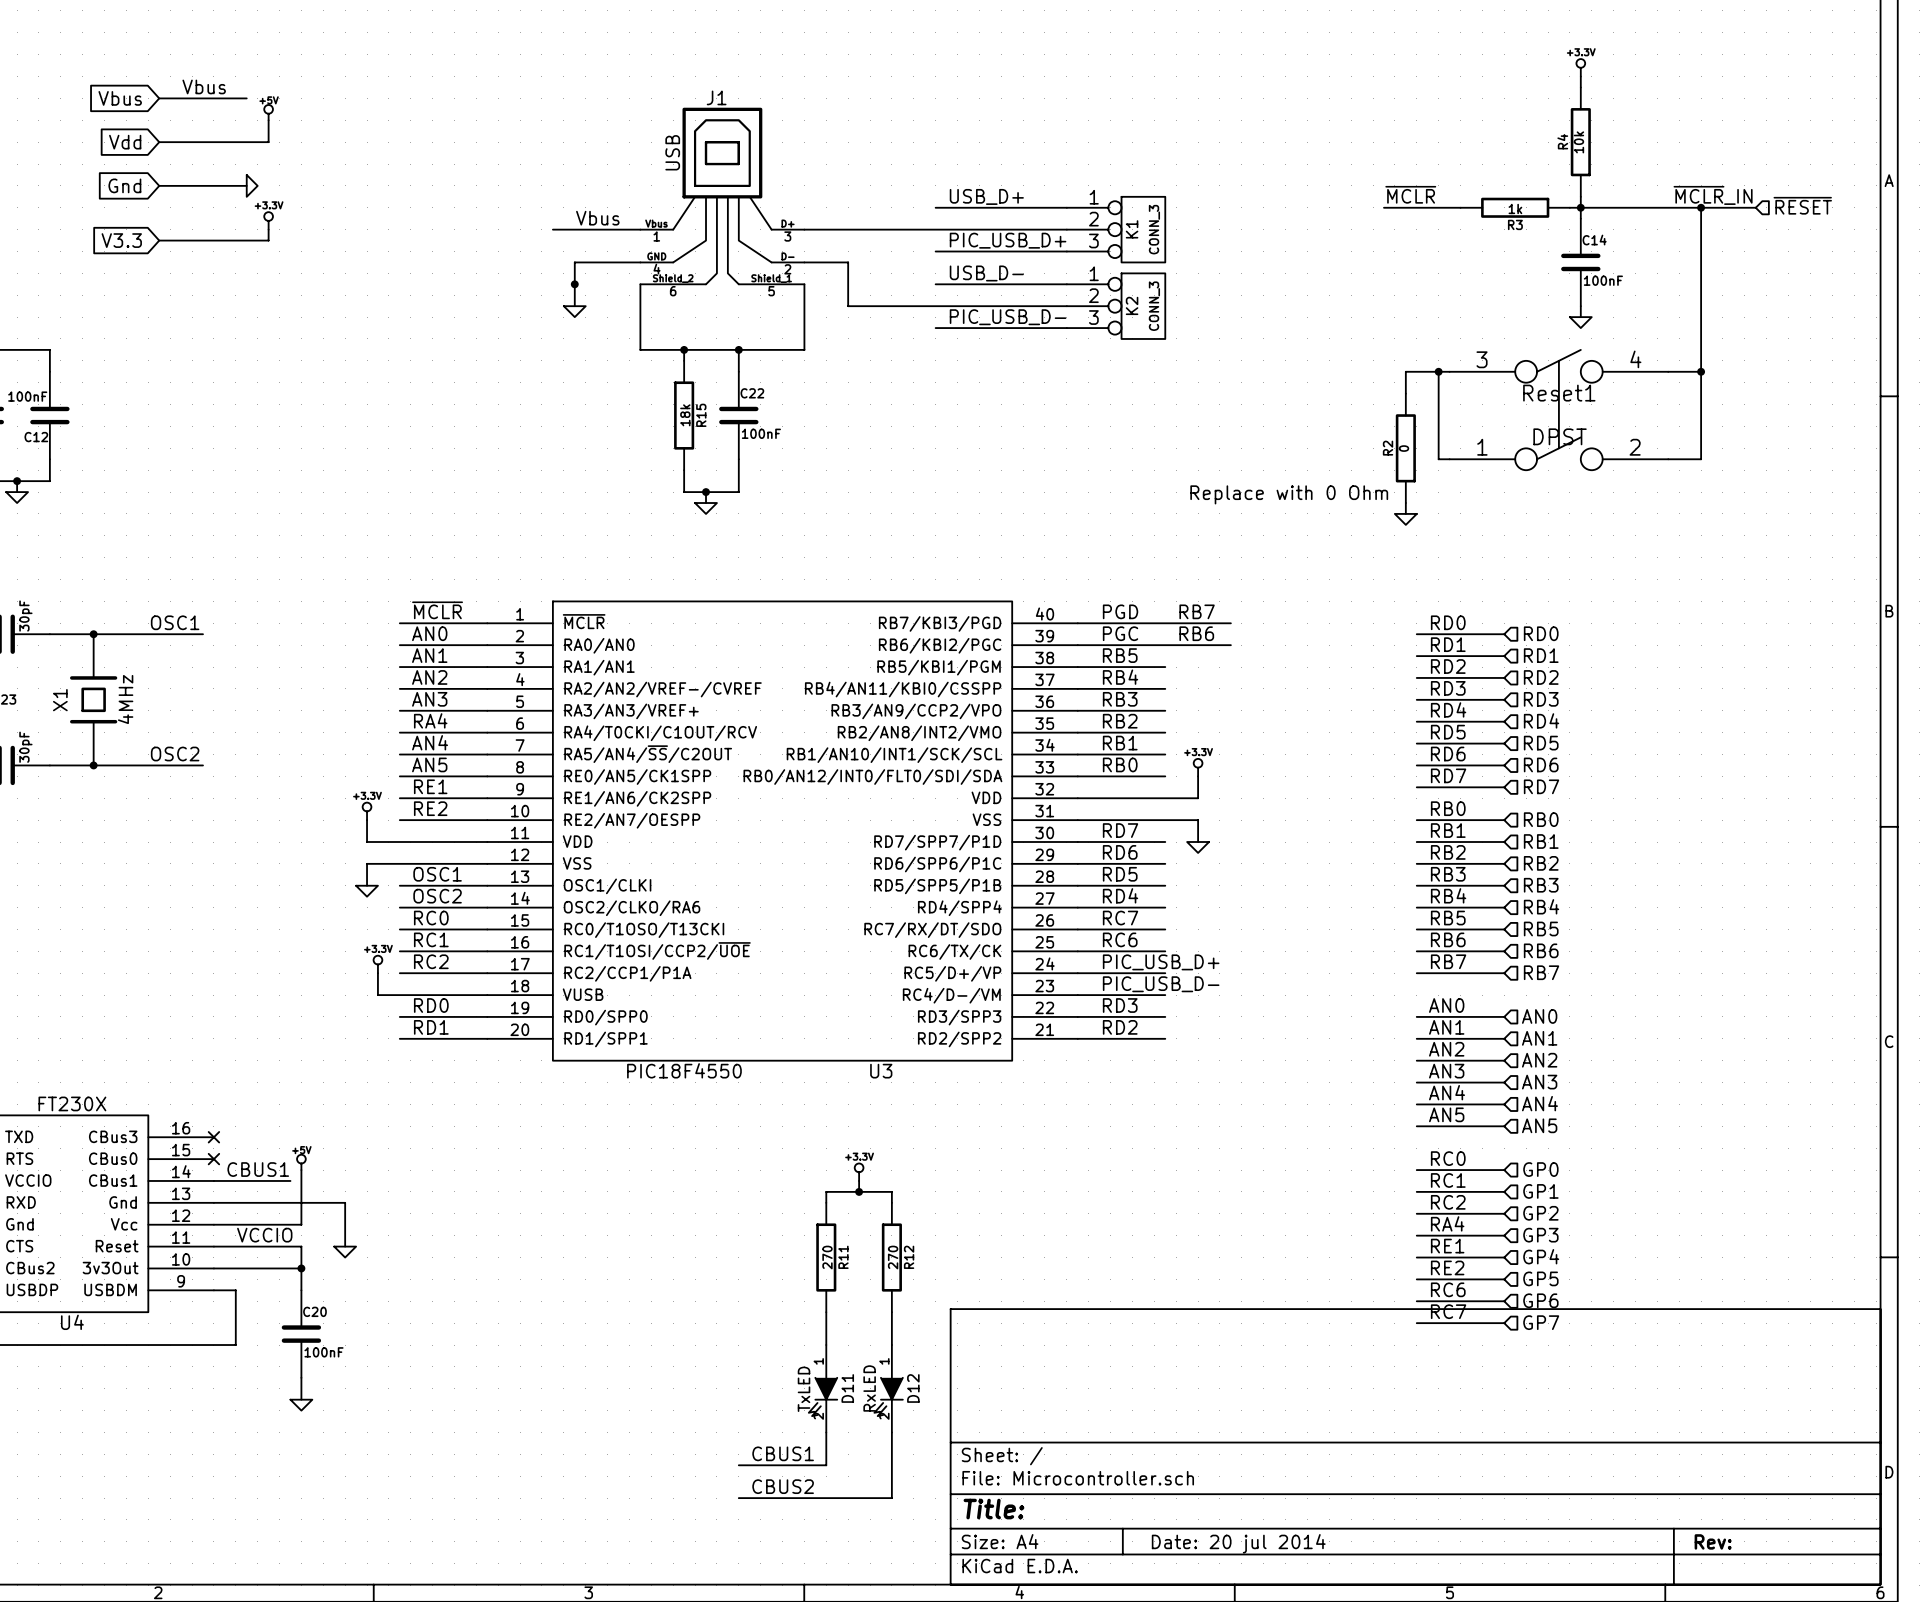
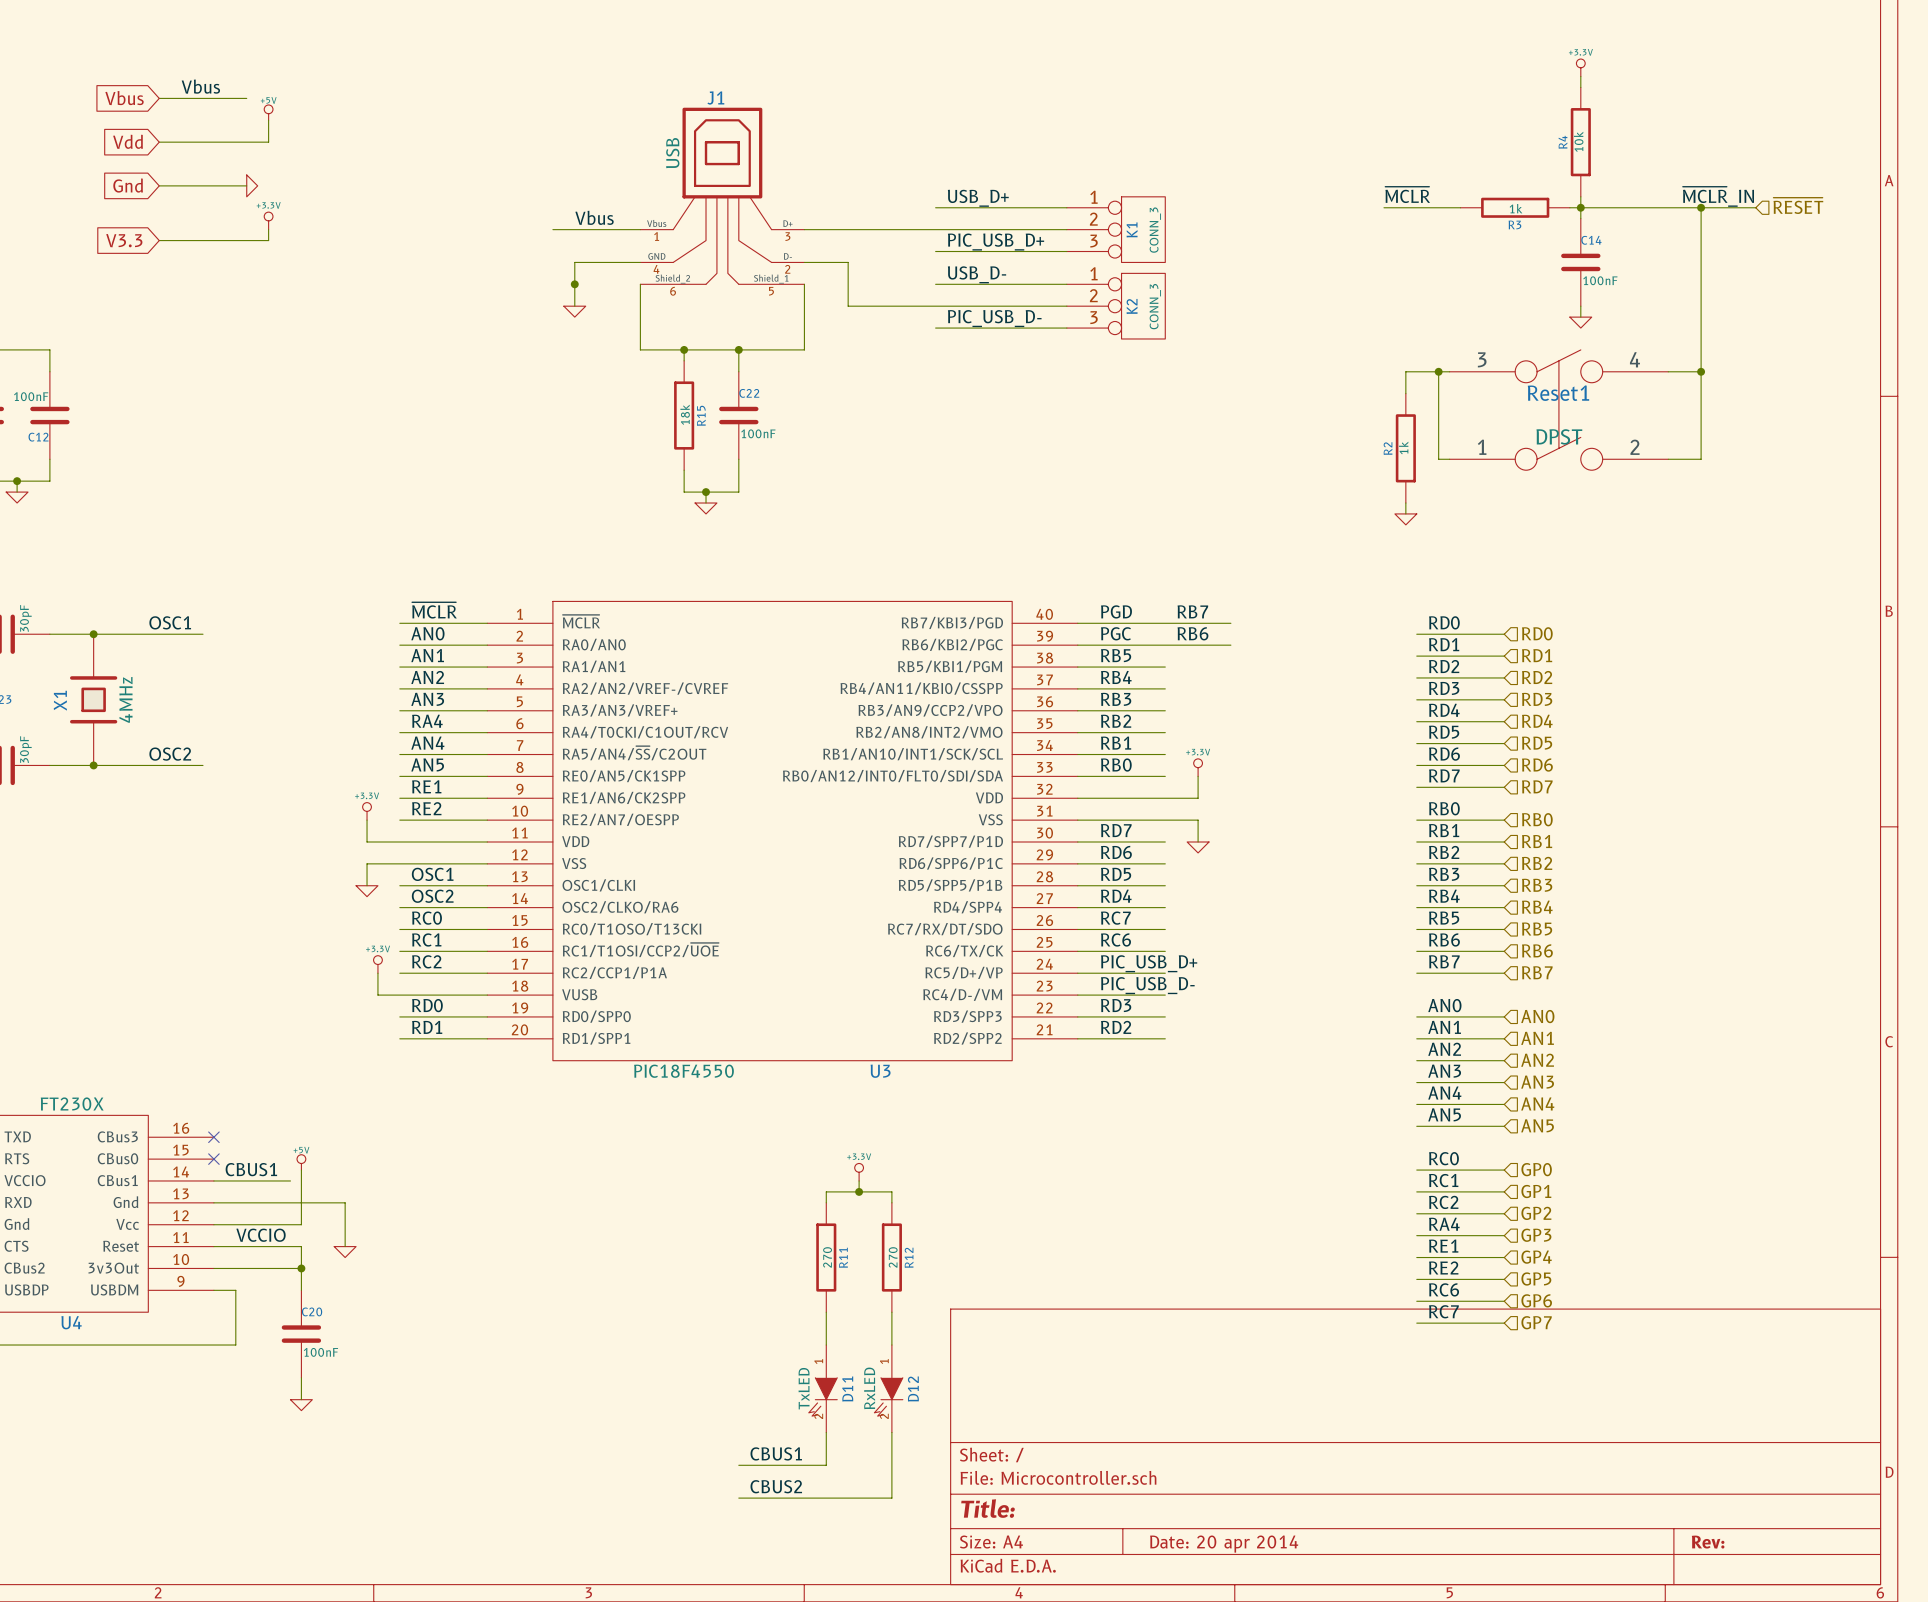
R2 value: 0 (1403, 448) -> 1k (1403, 447)
text: Replace with 0 Ohm (1289, 494) -> none
title block: Date: 20 jul 2014 (1238, 1543) -> Date: 20 apr 2014 (1224, 1544)

